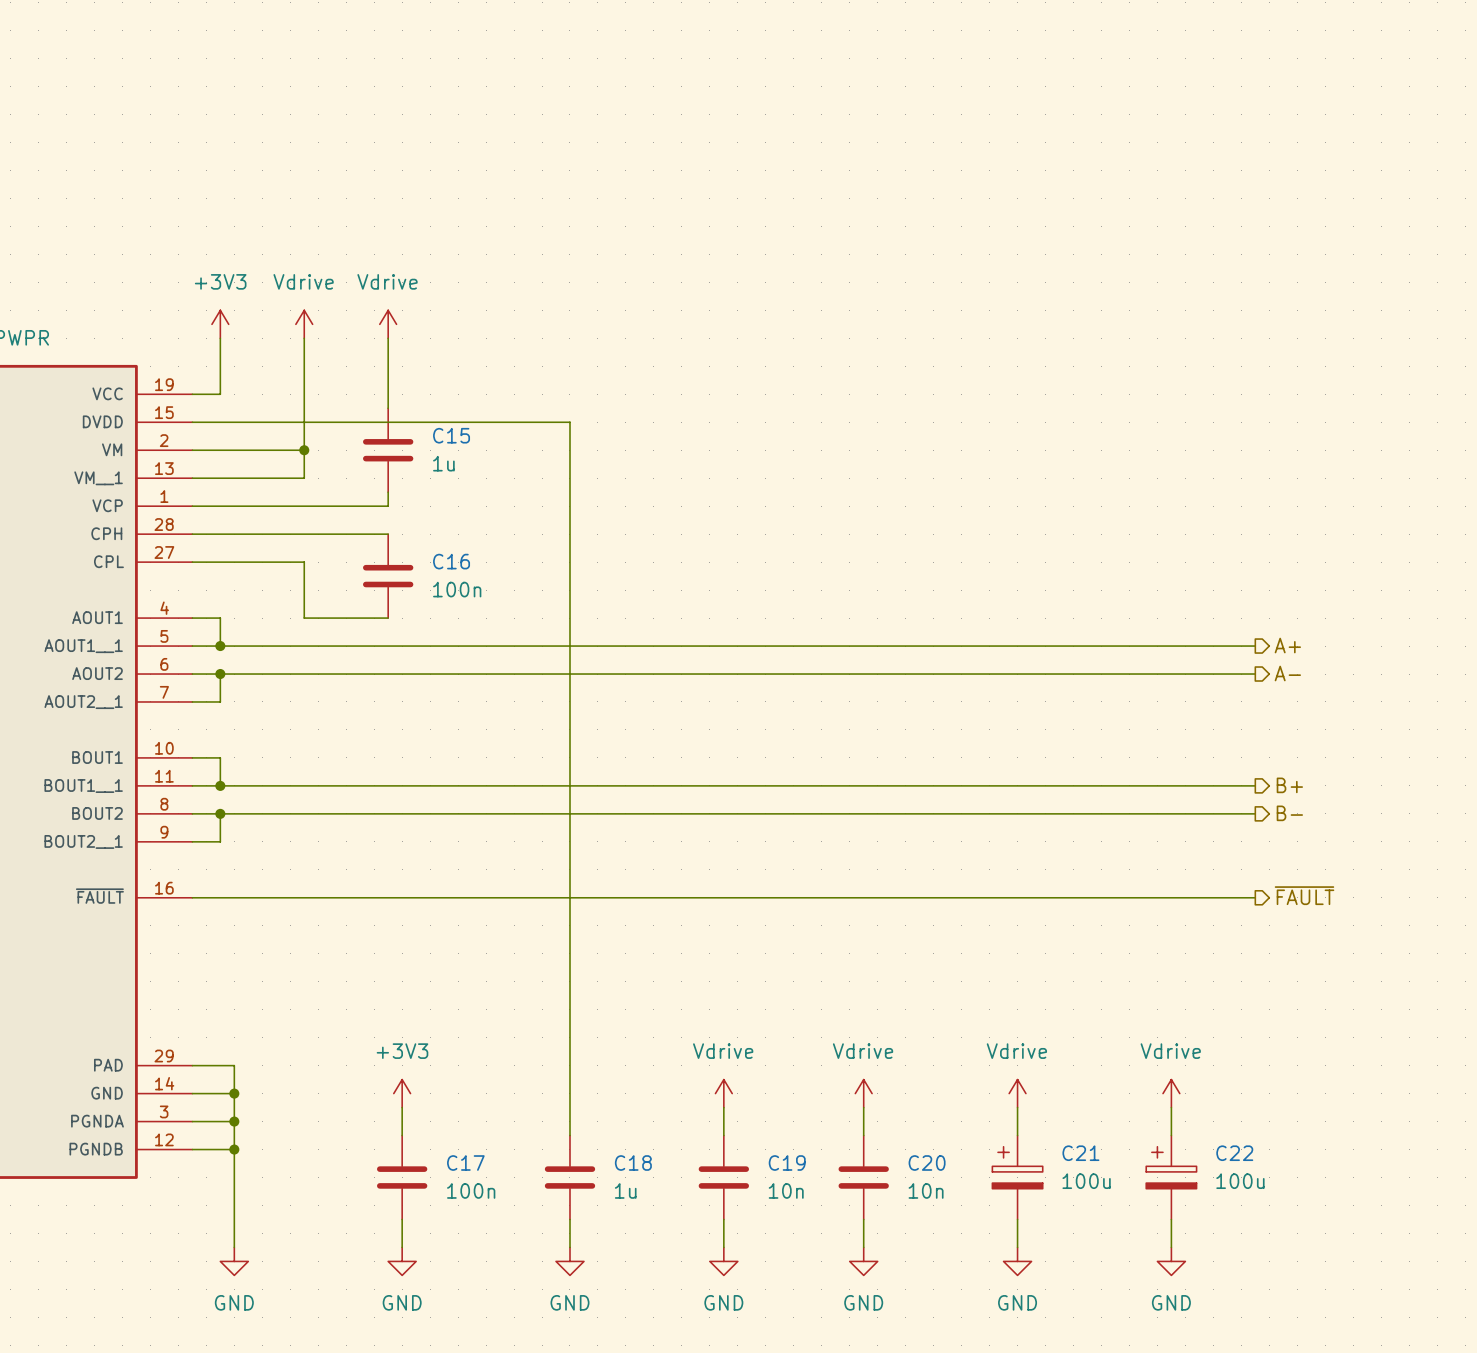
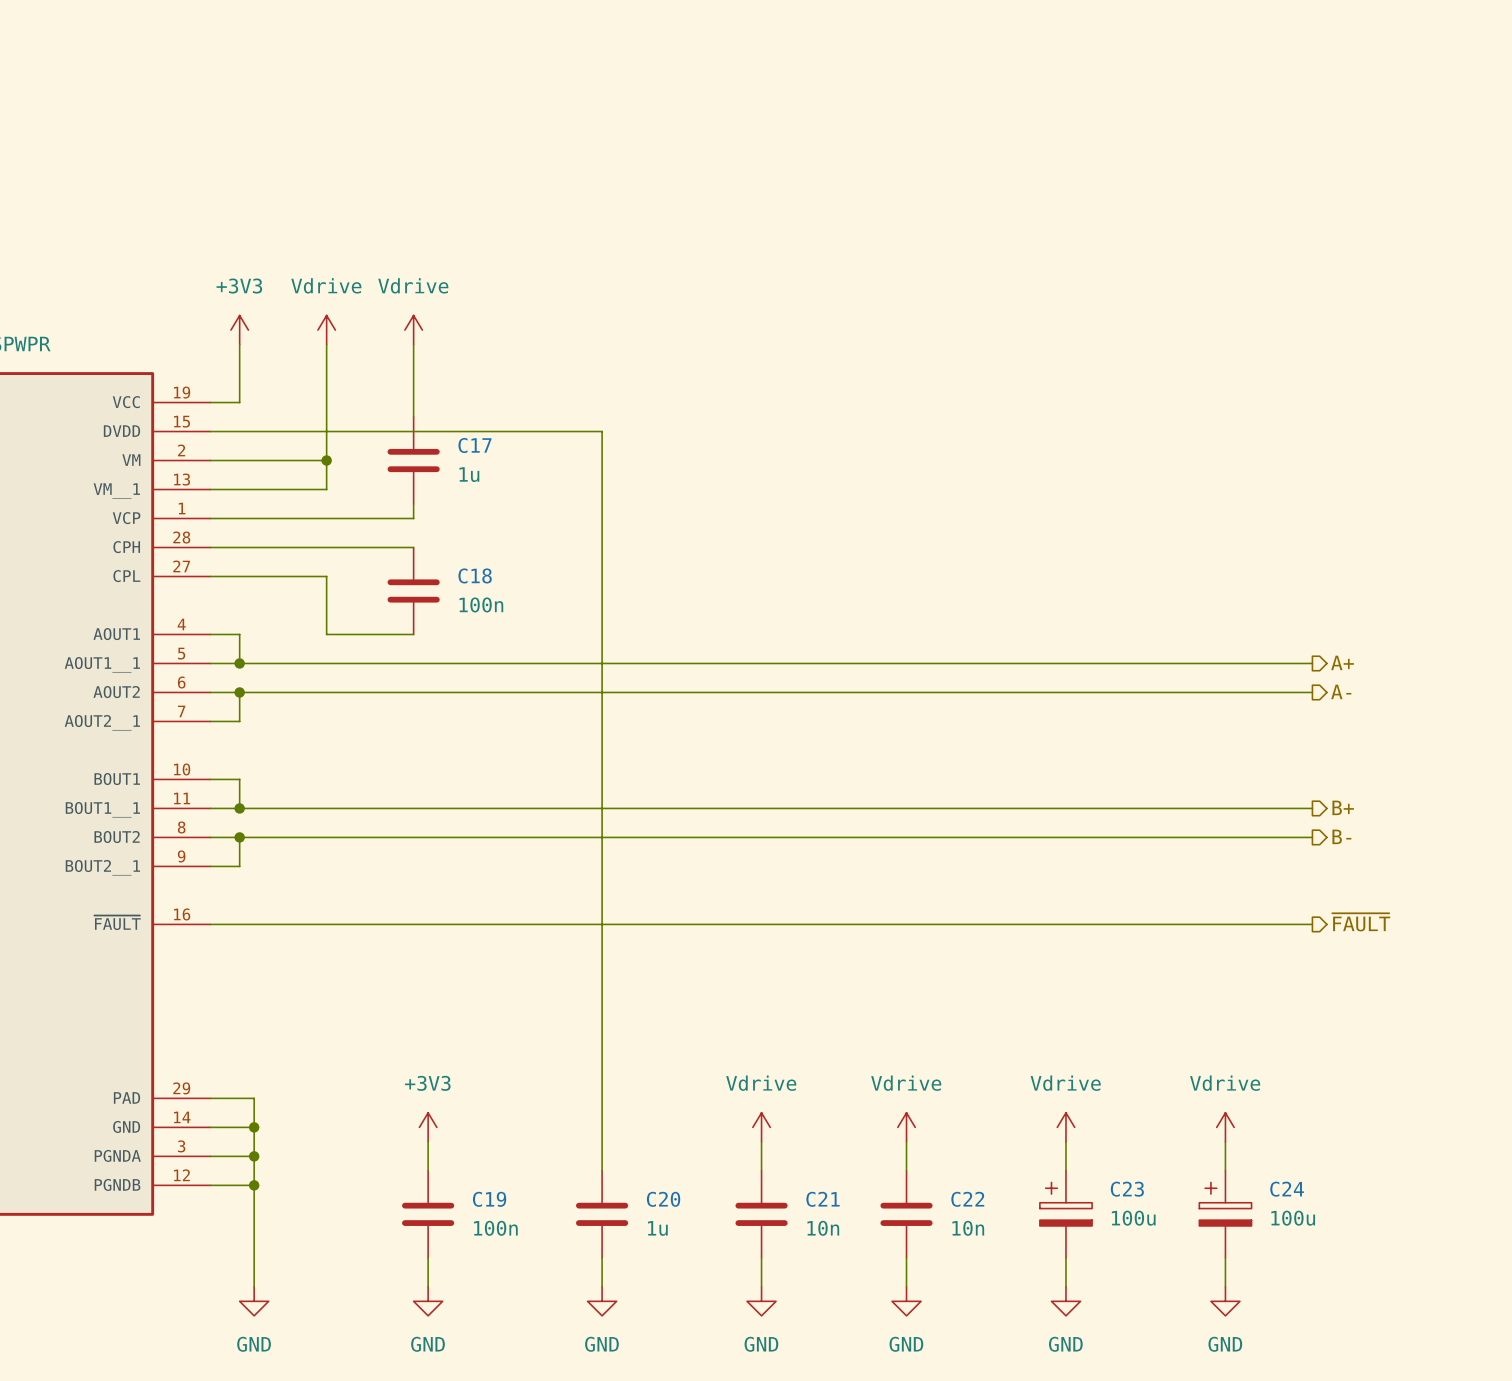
C15 name: C15 (451, 435) -> C17 (475, 445)
C16 name: C16 (451, 561) -> C18 (475, 575)
C21 name: C21 (1080, 1153) -> C23 (1127, 1189)
C22 name: C22 (1234, 1153) -> C24 (1287, 1189)
C17 name: C17 (465, 1163) -> C19 (489, 1199)
C18 name: C18 (633, 1163) -> C20 (663, 1199)
C19 name: C19 (787, 1163) -> C21 (822, 1199)
C20 name: C20 (927, 1163) -> C22 (967, 1199)

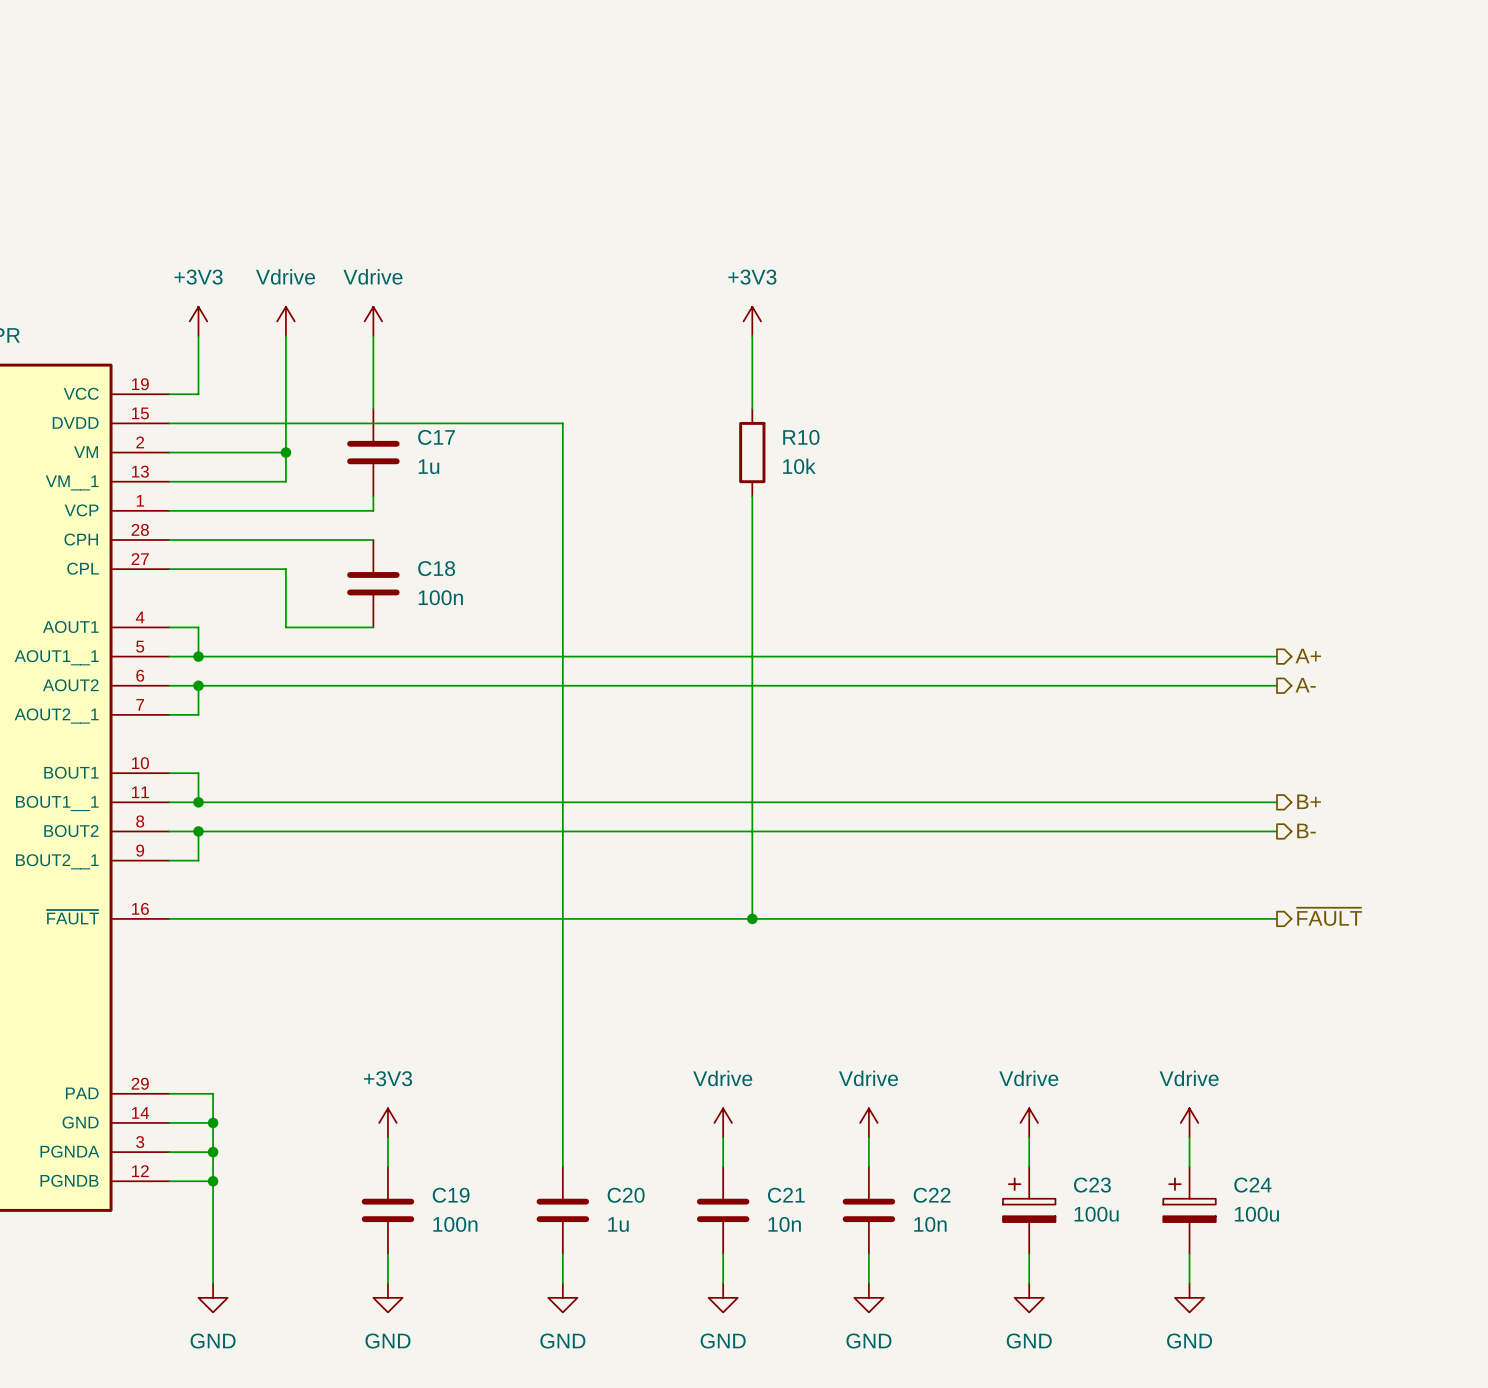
power symbol: none -> +3V3 (752, 321)
wire: none -> (752, 335) (752, 408)
R10: none -> 10k (752, 452)
wire: none -> (752, 496) (752, 918)
junction: none -> (752, 918)

